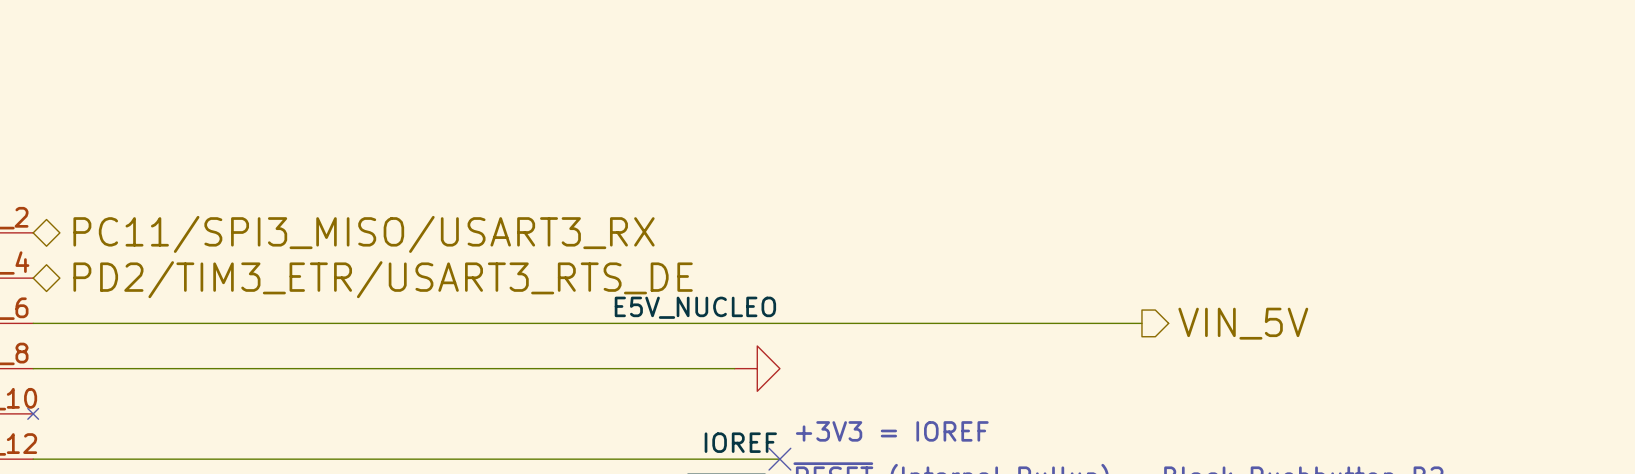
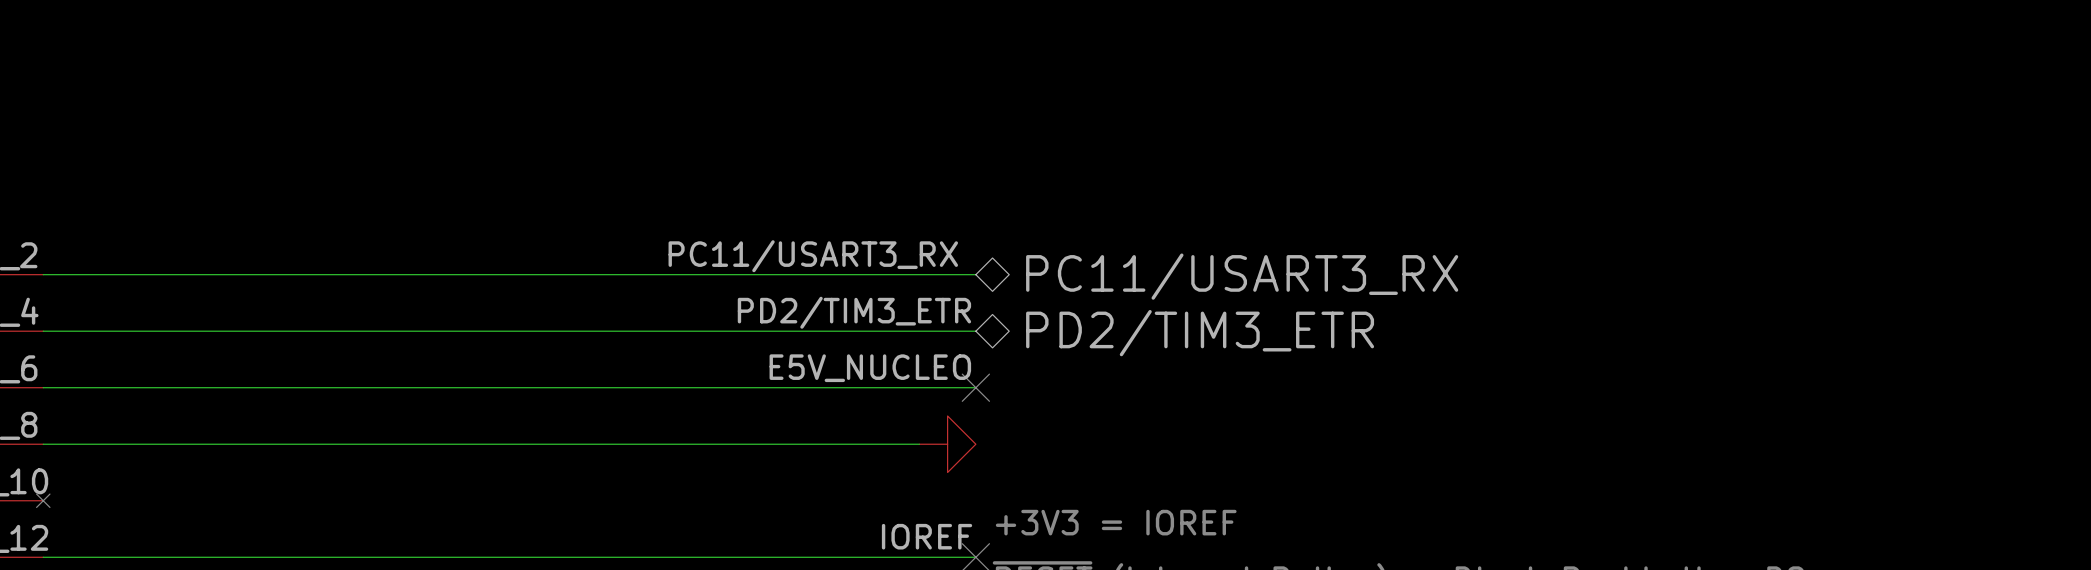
label: none -> PC11/USART3_RX (813, 256)
wire: none -> (43, 274) (975, 274)
hierarchical label: PC11/SPI3_MISO/USART3_RX (364, 234) -> none
hierarchical label: none -> PC11/USART3_RX (1242, 276)
label: none -> PD2/TIM3_ETR (854, 312)
wire: none -> (43, 331) (975, 331)
hierarchical label: PD2/TIM3_ETR/USART3_RTS_DE (383, 279) -> none
hierarchical label: none -> PD2/TIM3_ETR (1200, 333)
wire: (779, 323) (1141, 323) -> none
no-connect mark: none -> (975, 387)
hierarchical label: VIN_5V (1243, 323) -> none

